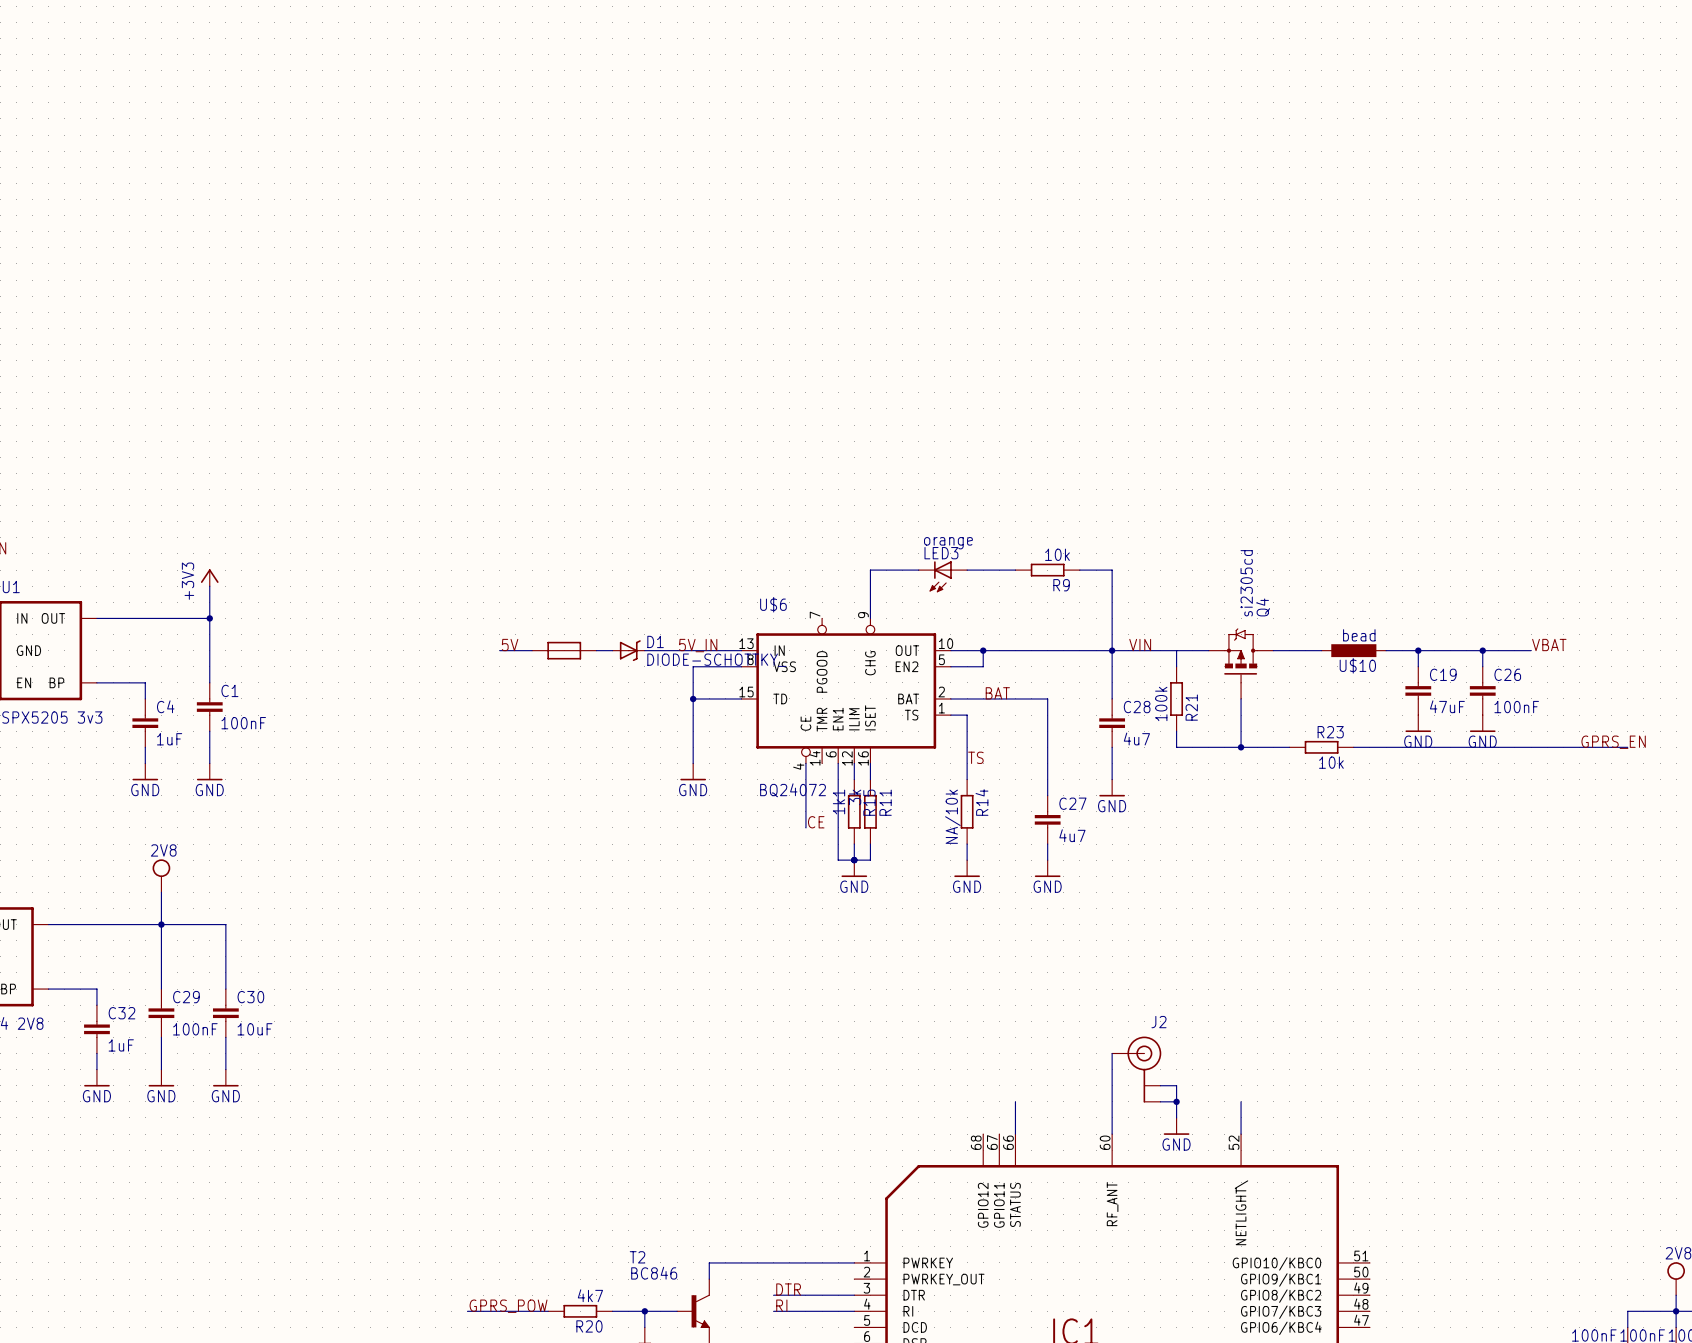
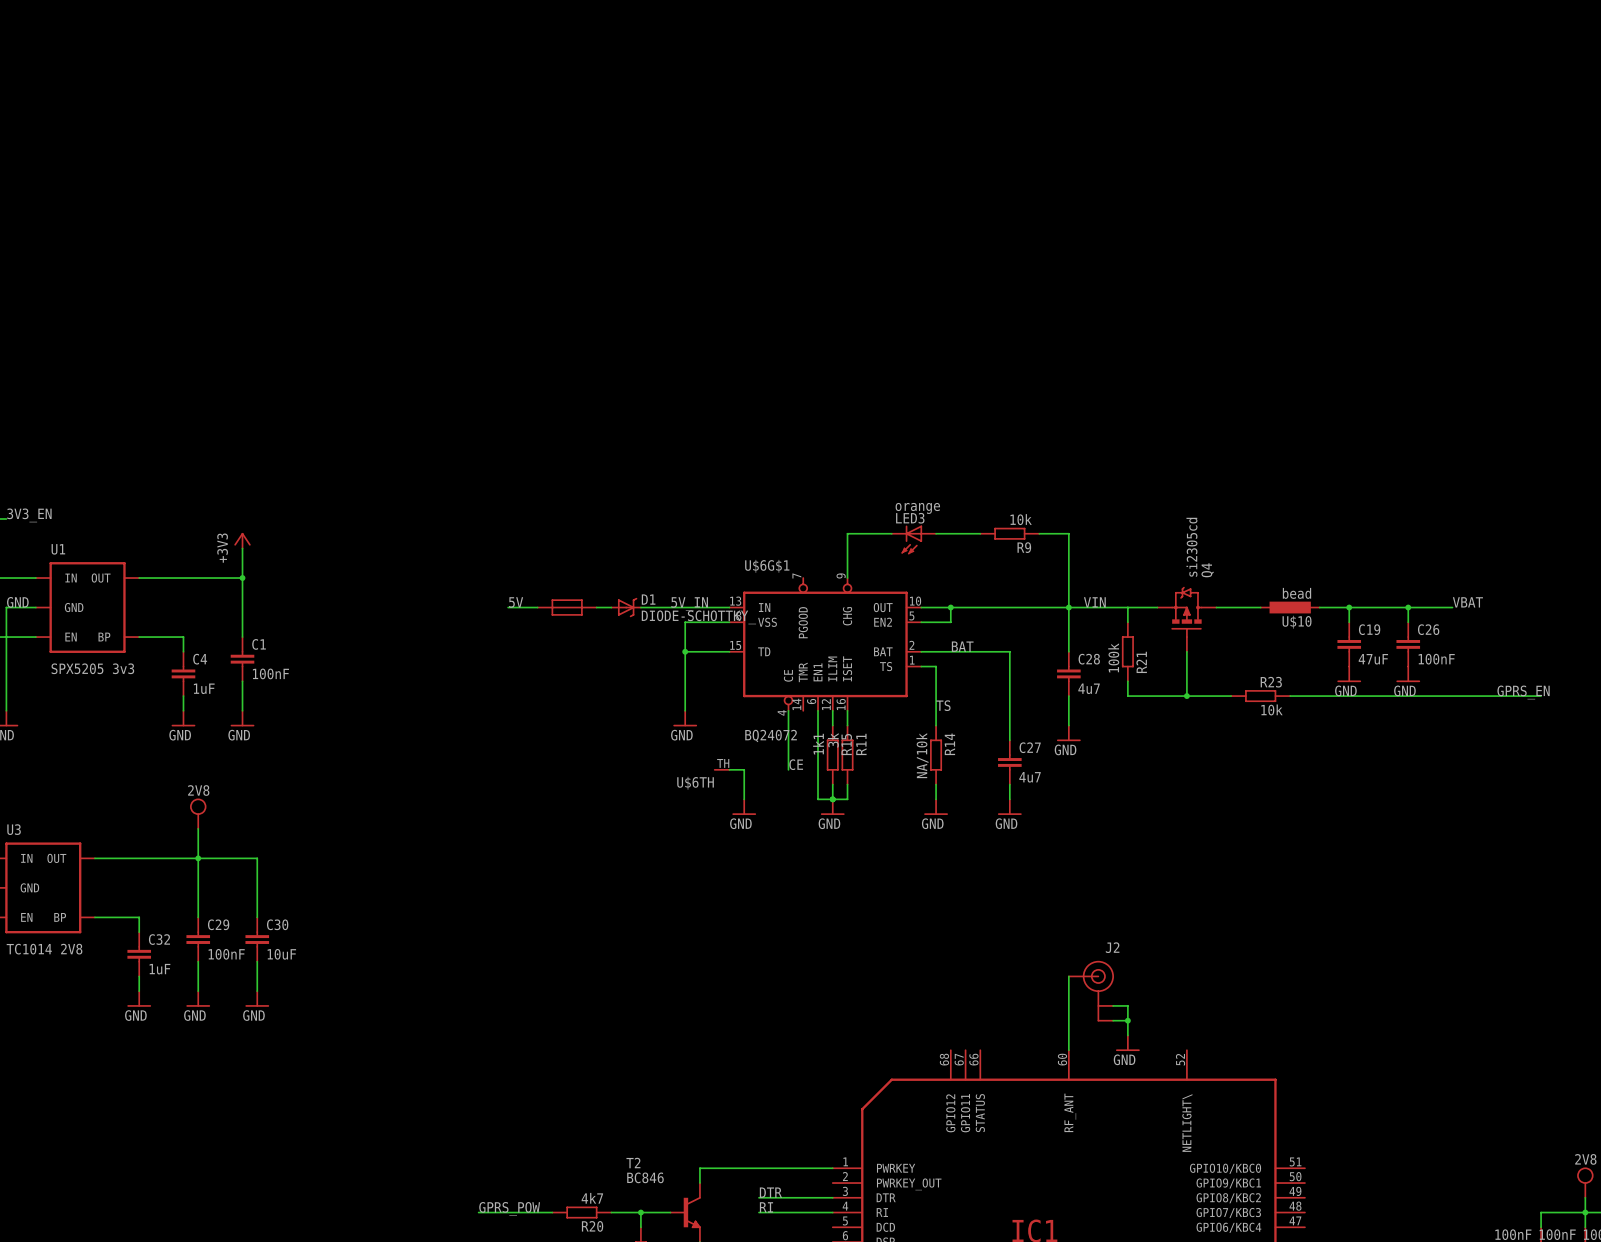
U$6 name: U$6 (773, 604) -> U$6G$1 (767, 566)
U$6TH: none -> (722, 769)
wire: none -> (729, 769) (744, 769) (744, 799)
power symbol: none -> GND (744, 807)
wire: (1015, 1101) (1015, 1134) -> none
wire: (1241, 1101) (1241, 1134) -> none

